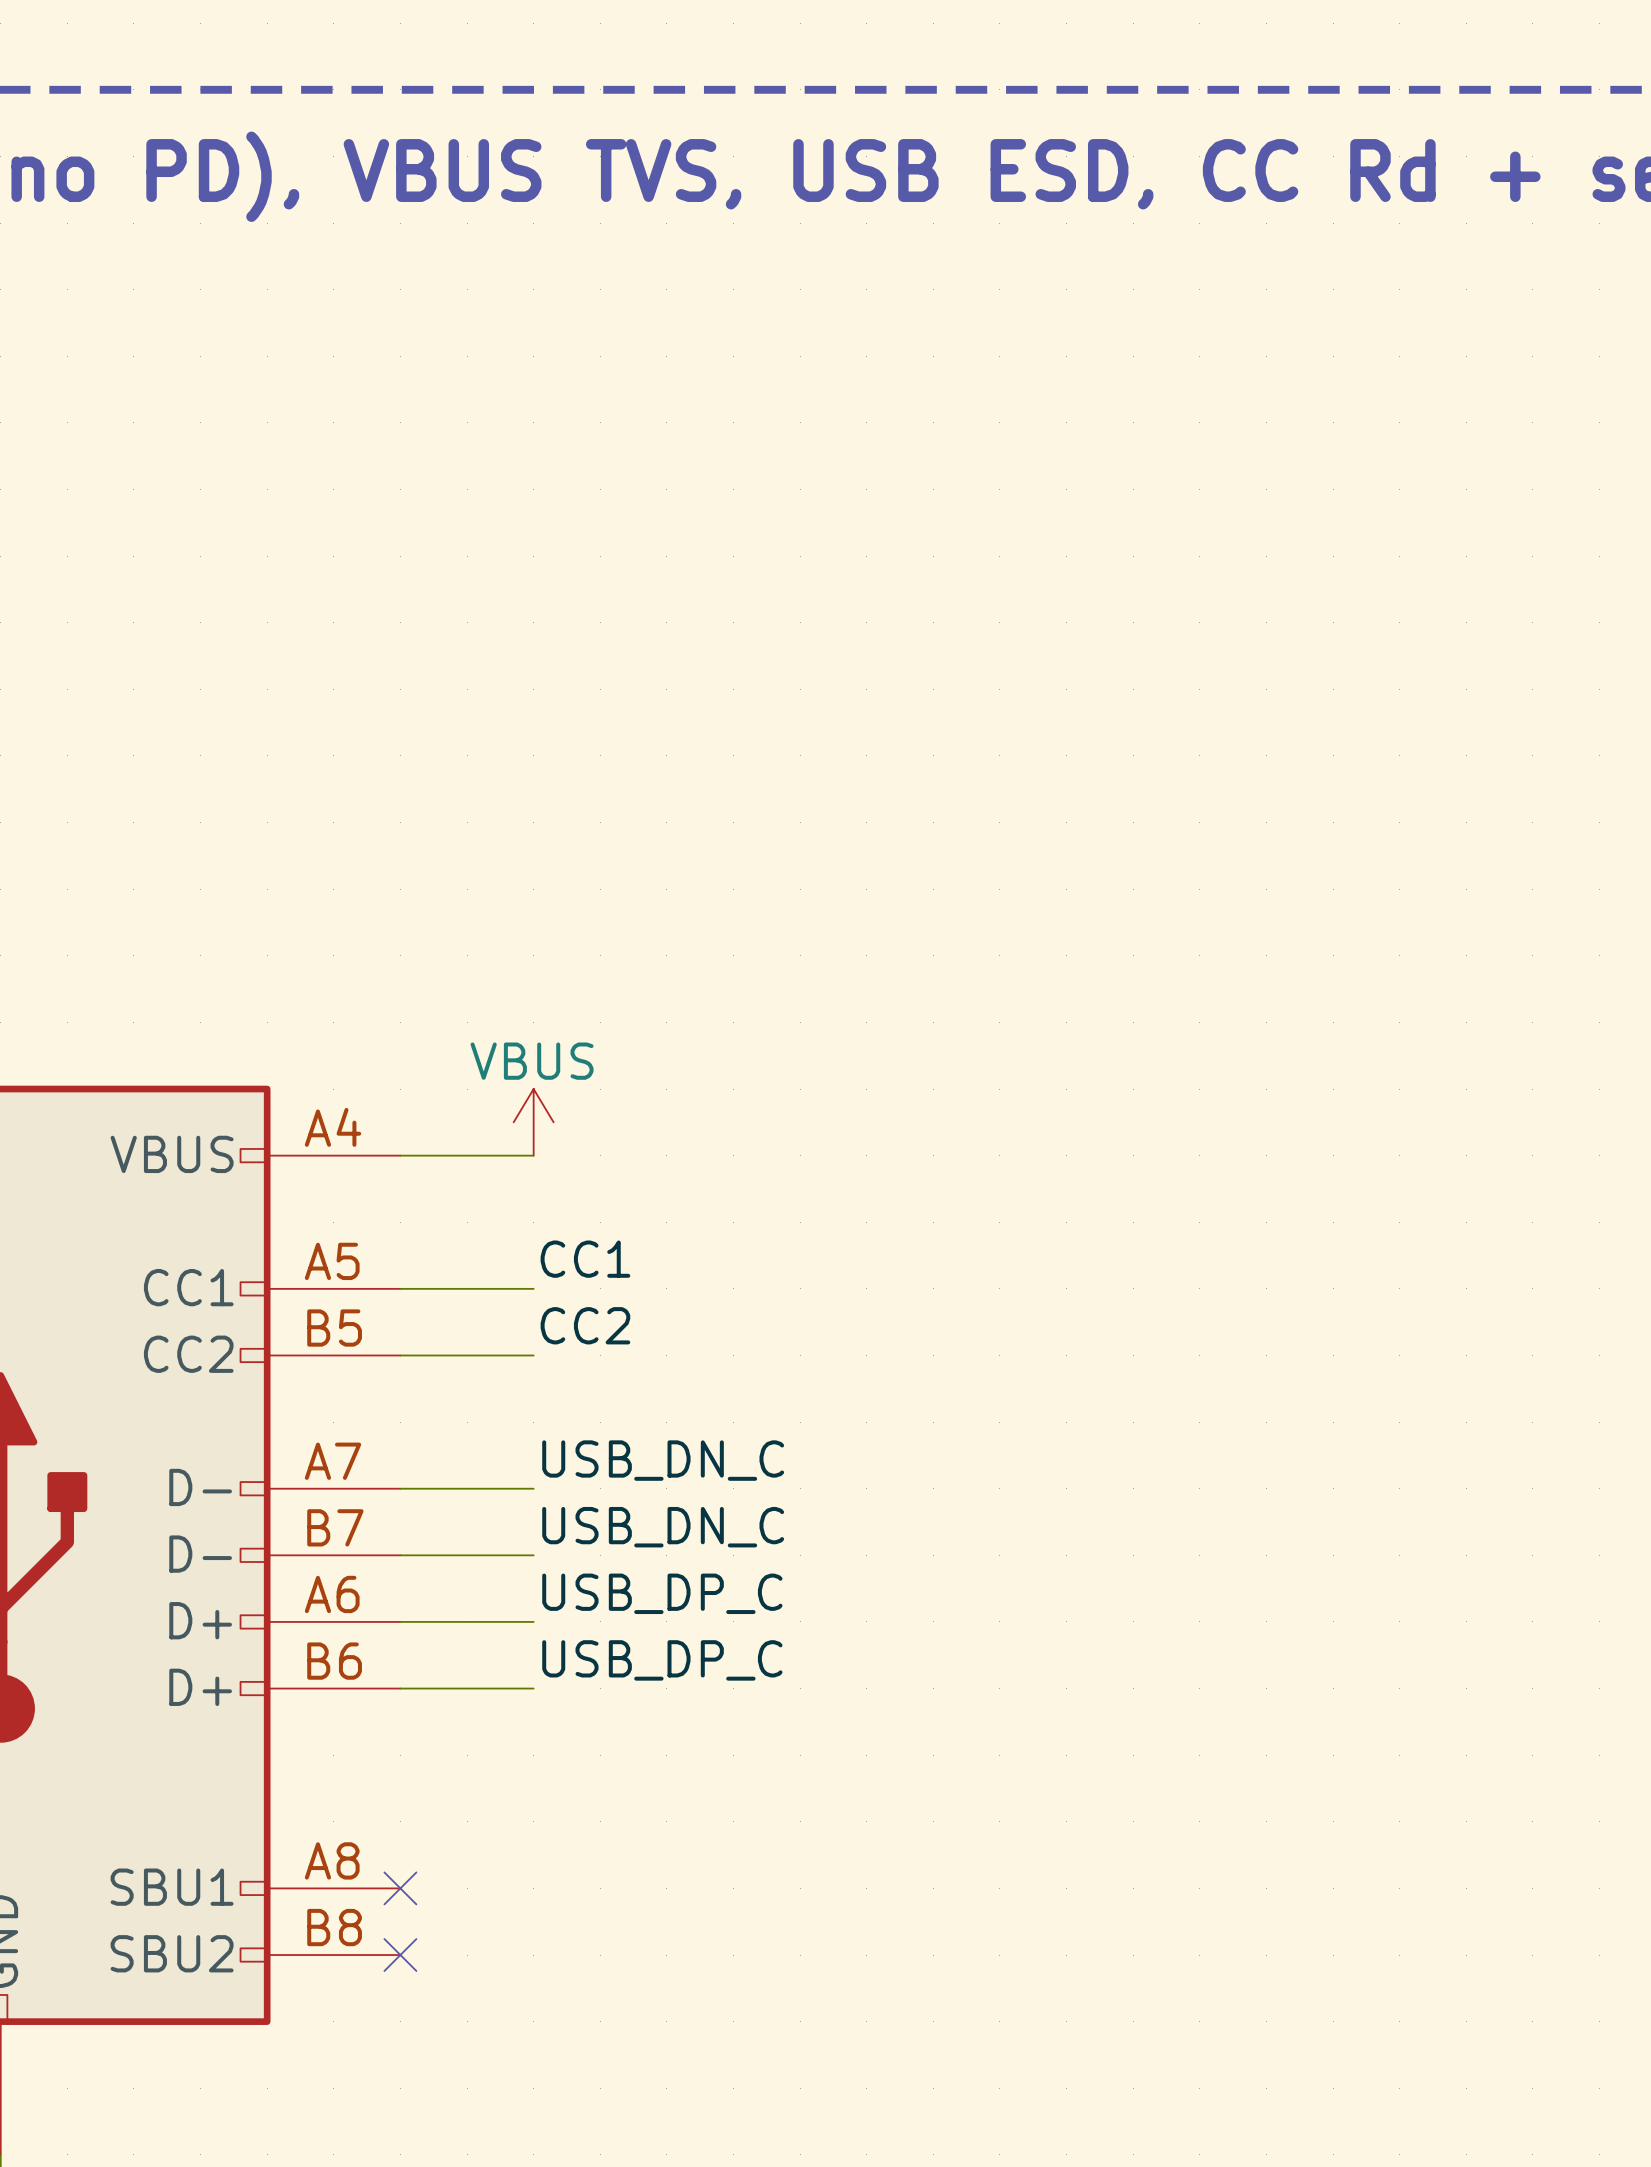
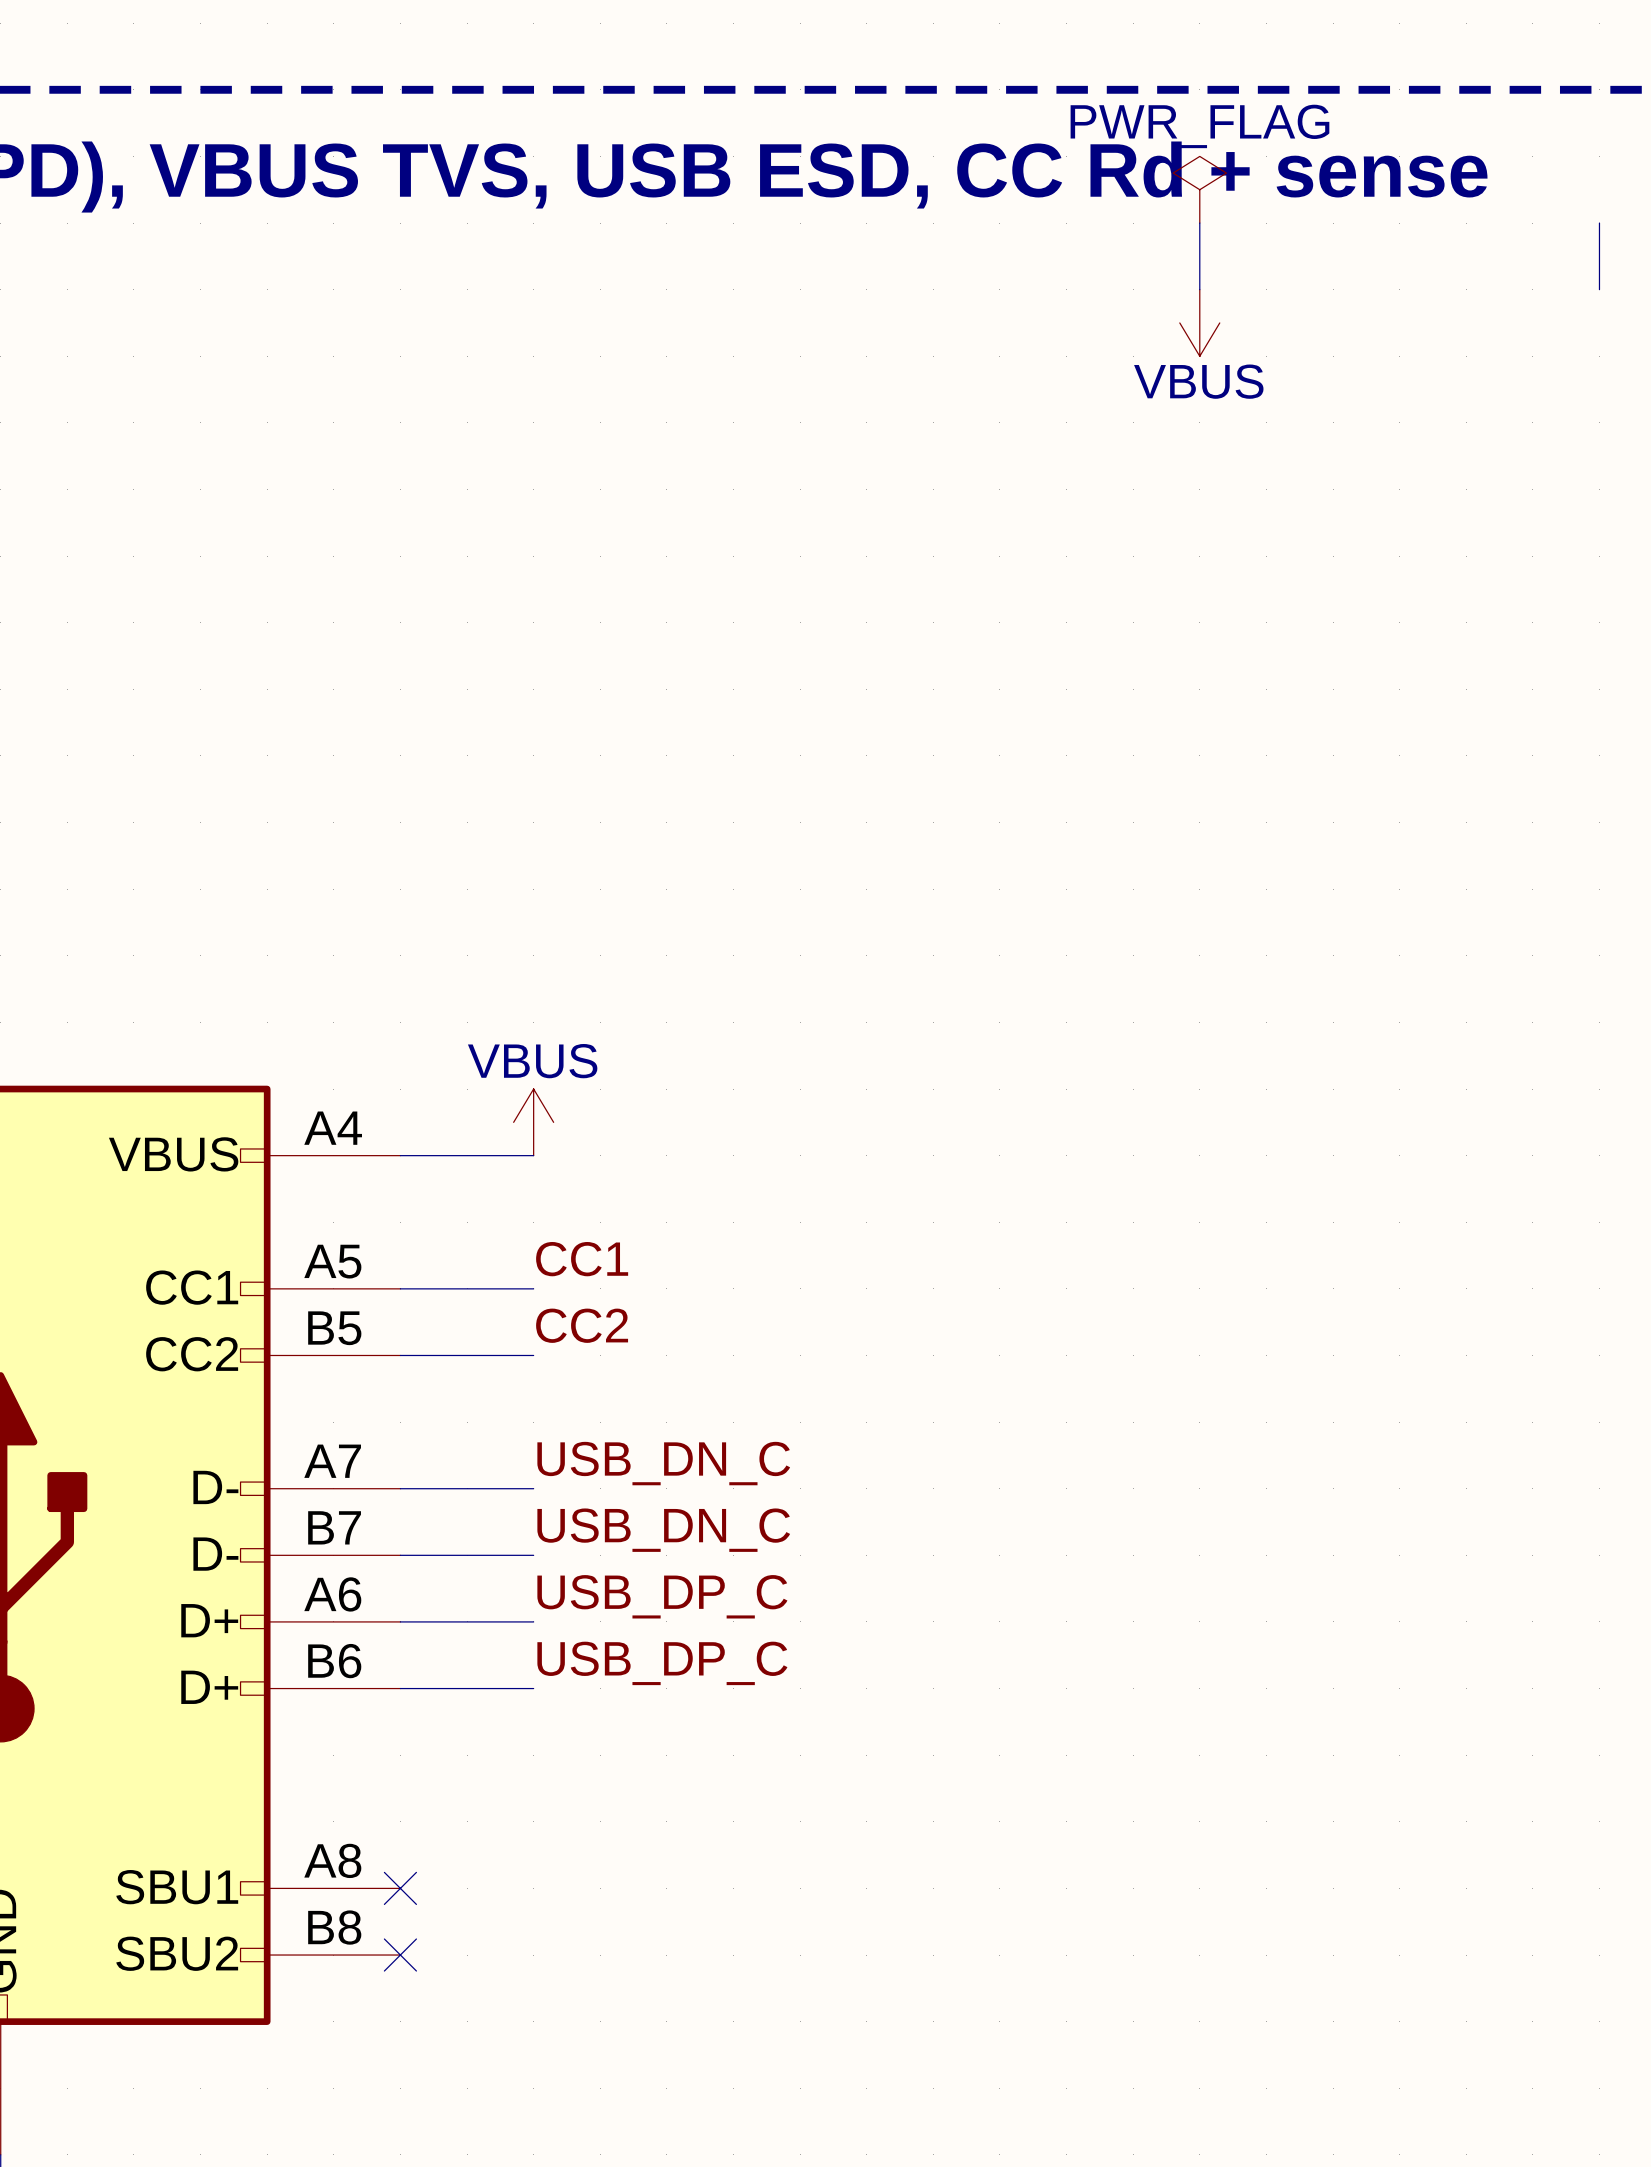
power symbol: none -> PWR_FLAG (1199, 189)
wire: none -> (1199, 223) (1199, 289)
wire: none -> (1599, 223) (1599, 289)
power symbol: none -> VBUS (1199, 322)

